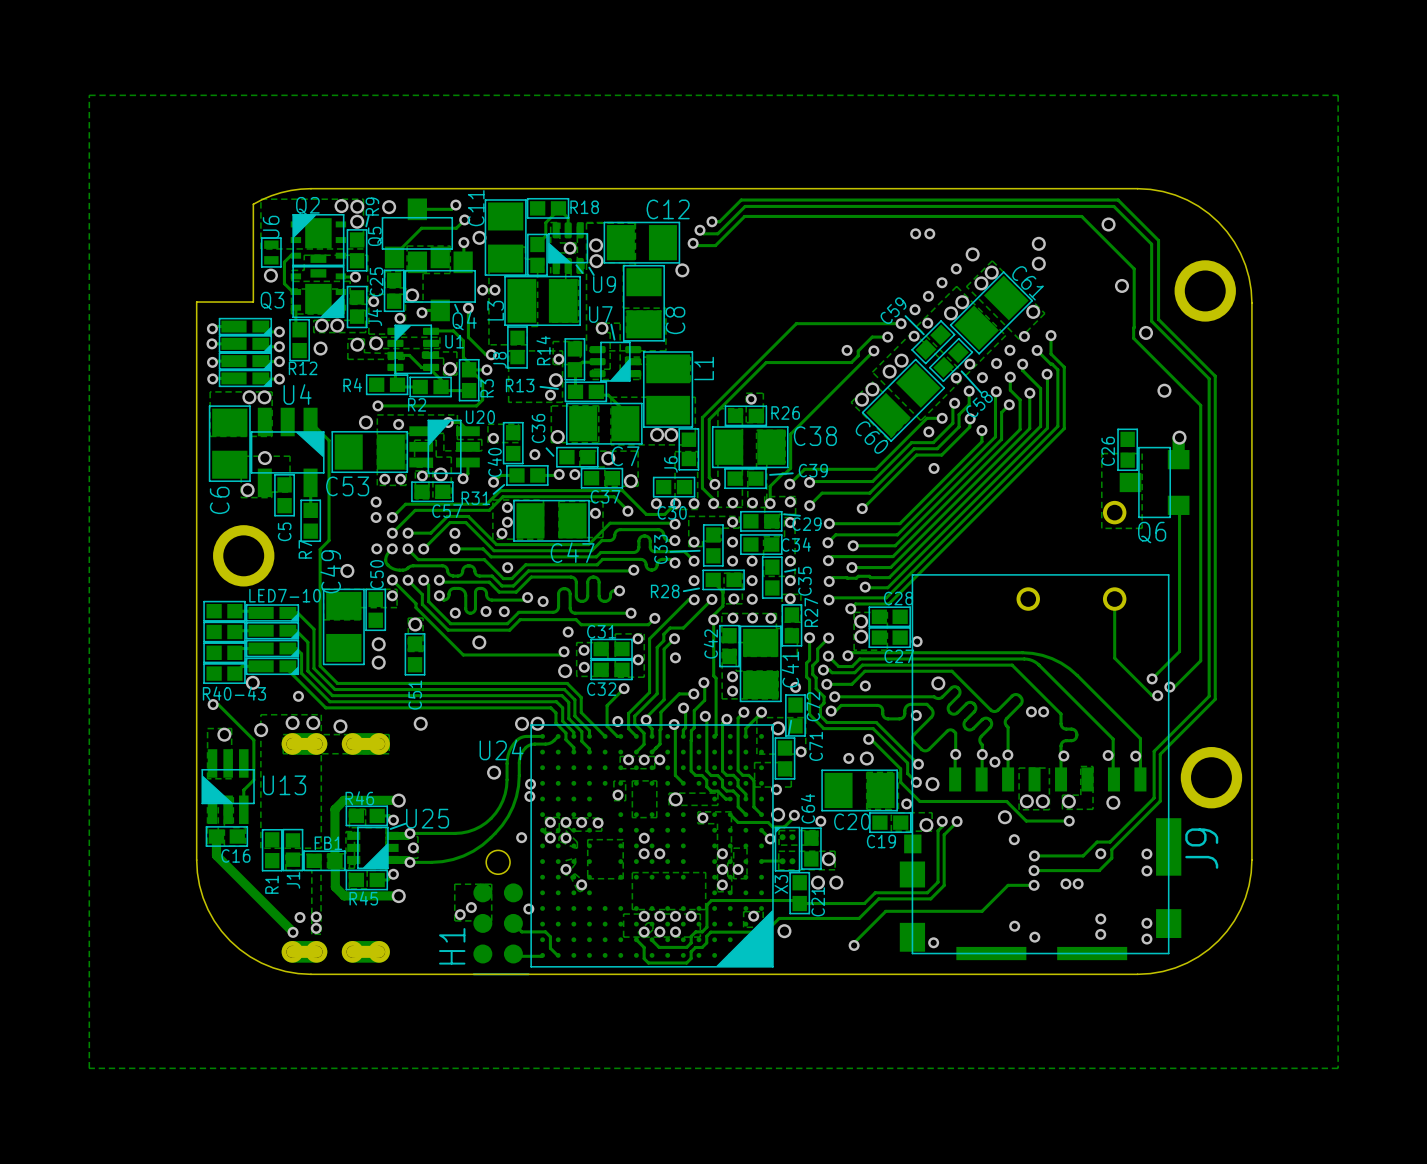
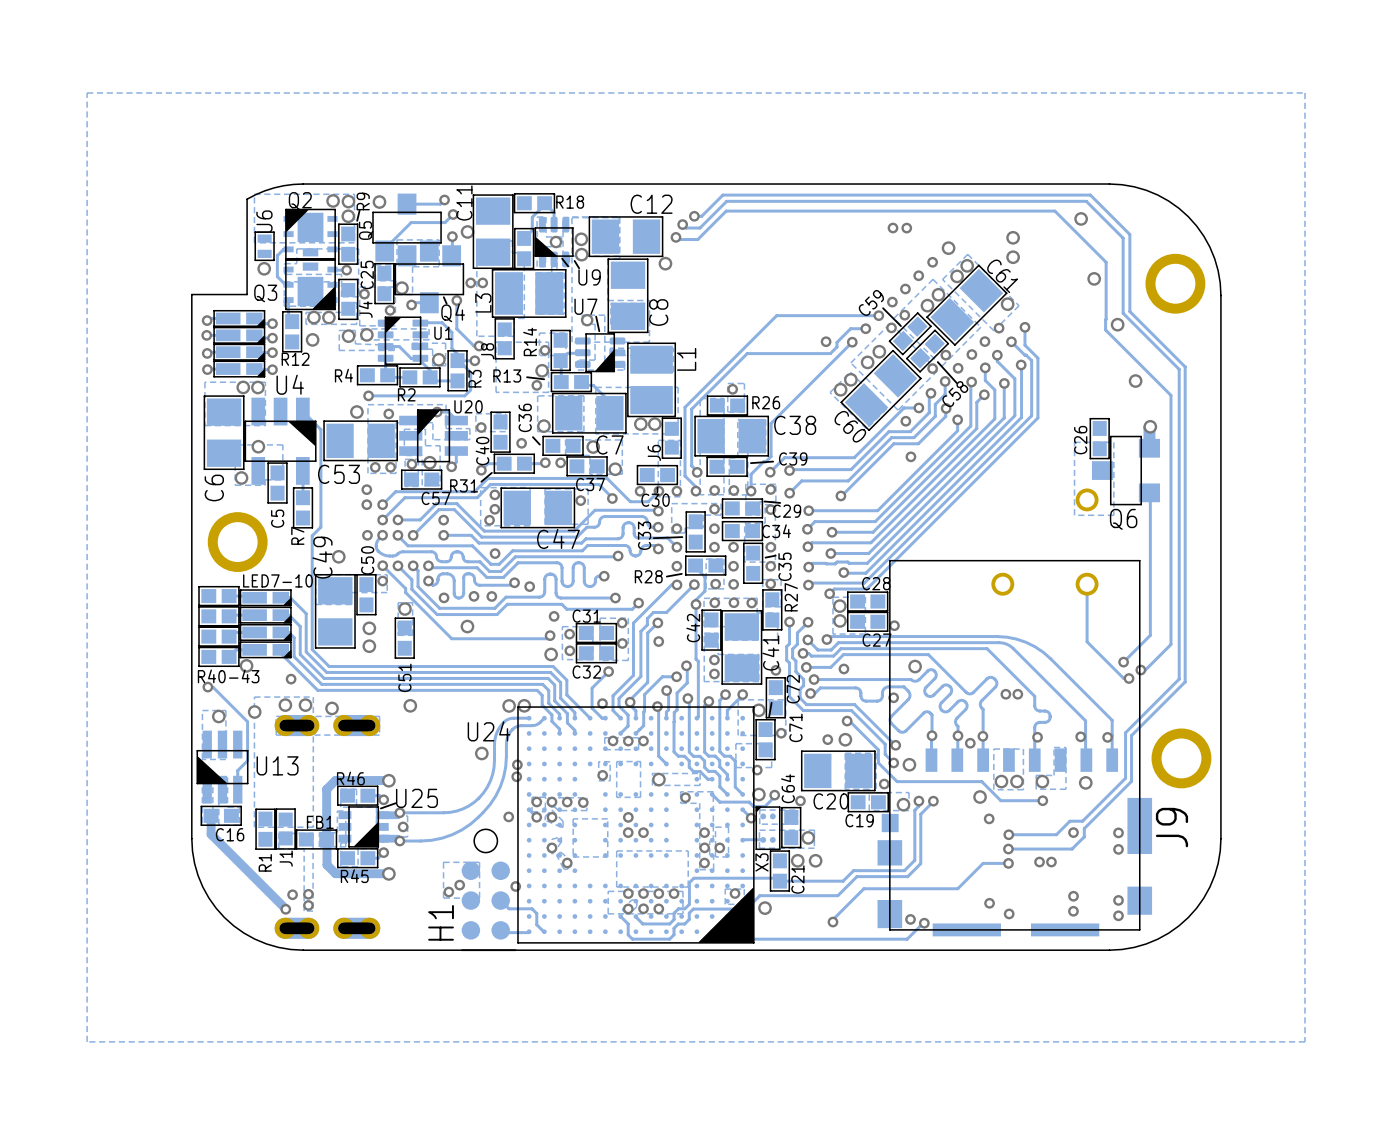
track: none -> (924, 923) (907, 939) (733, 939) (727, 931)
via: none -> (924, 923)

